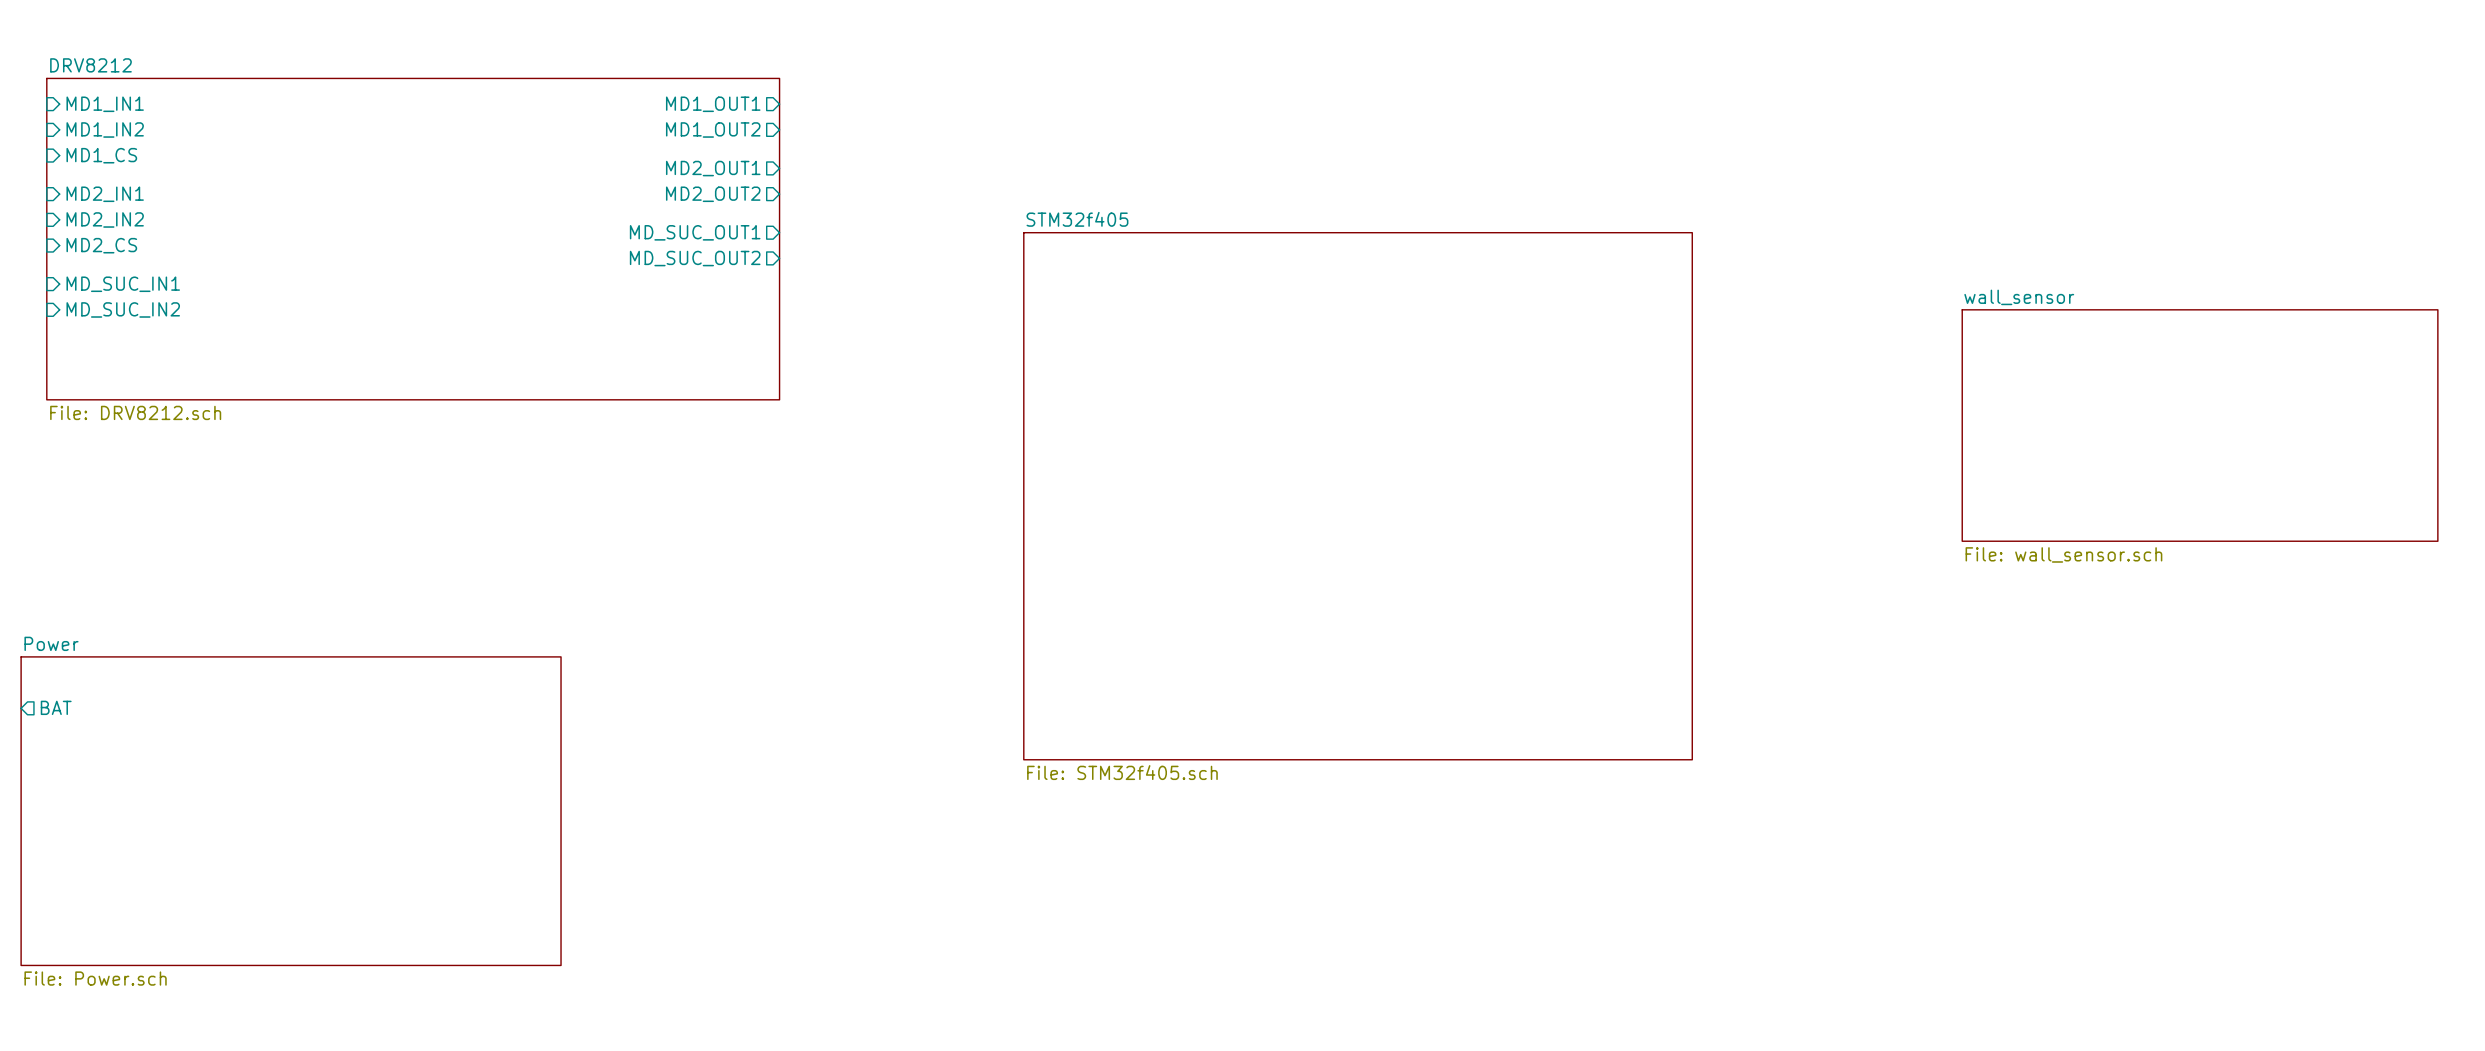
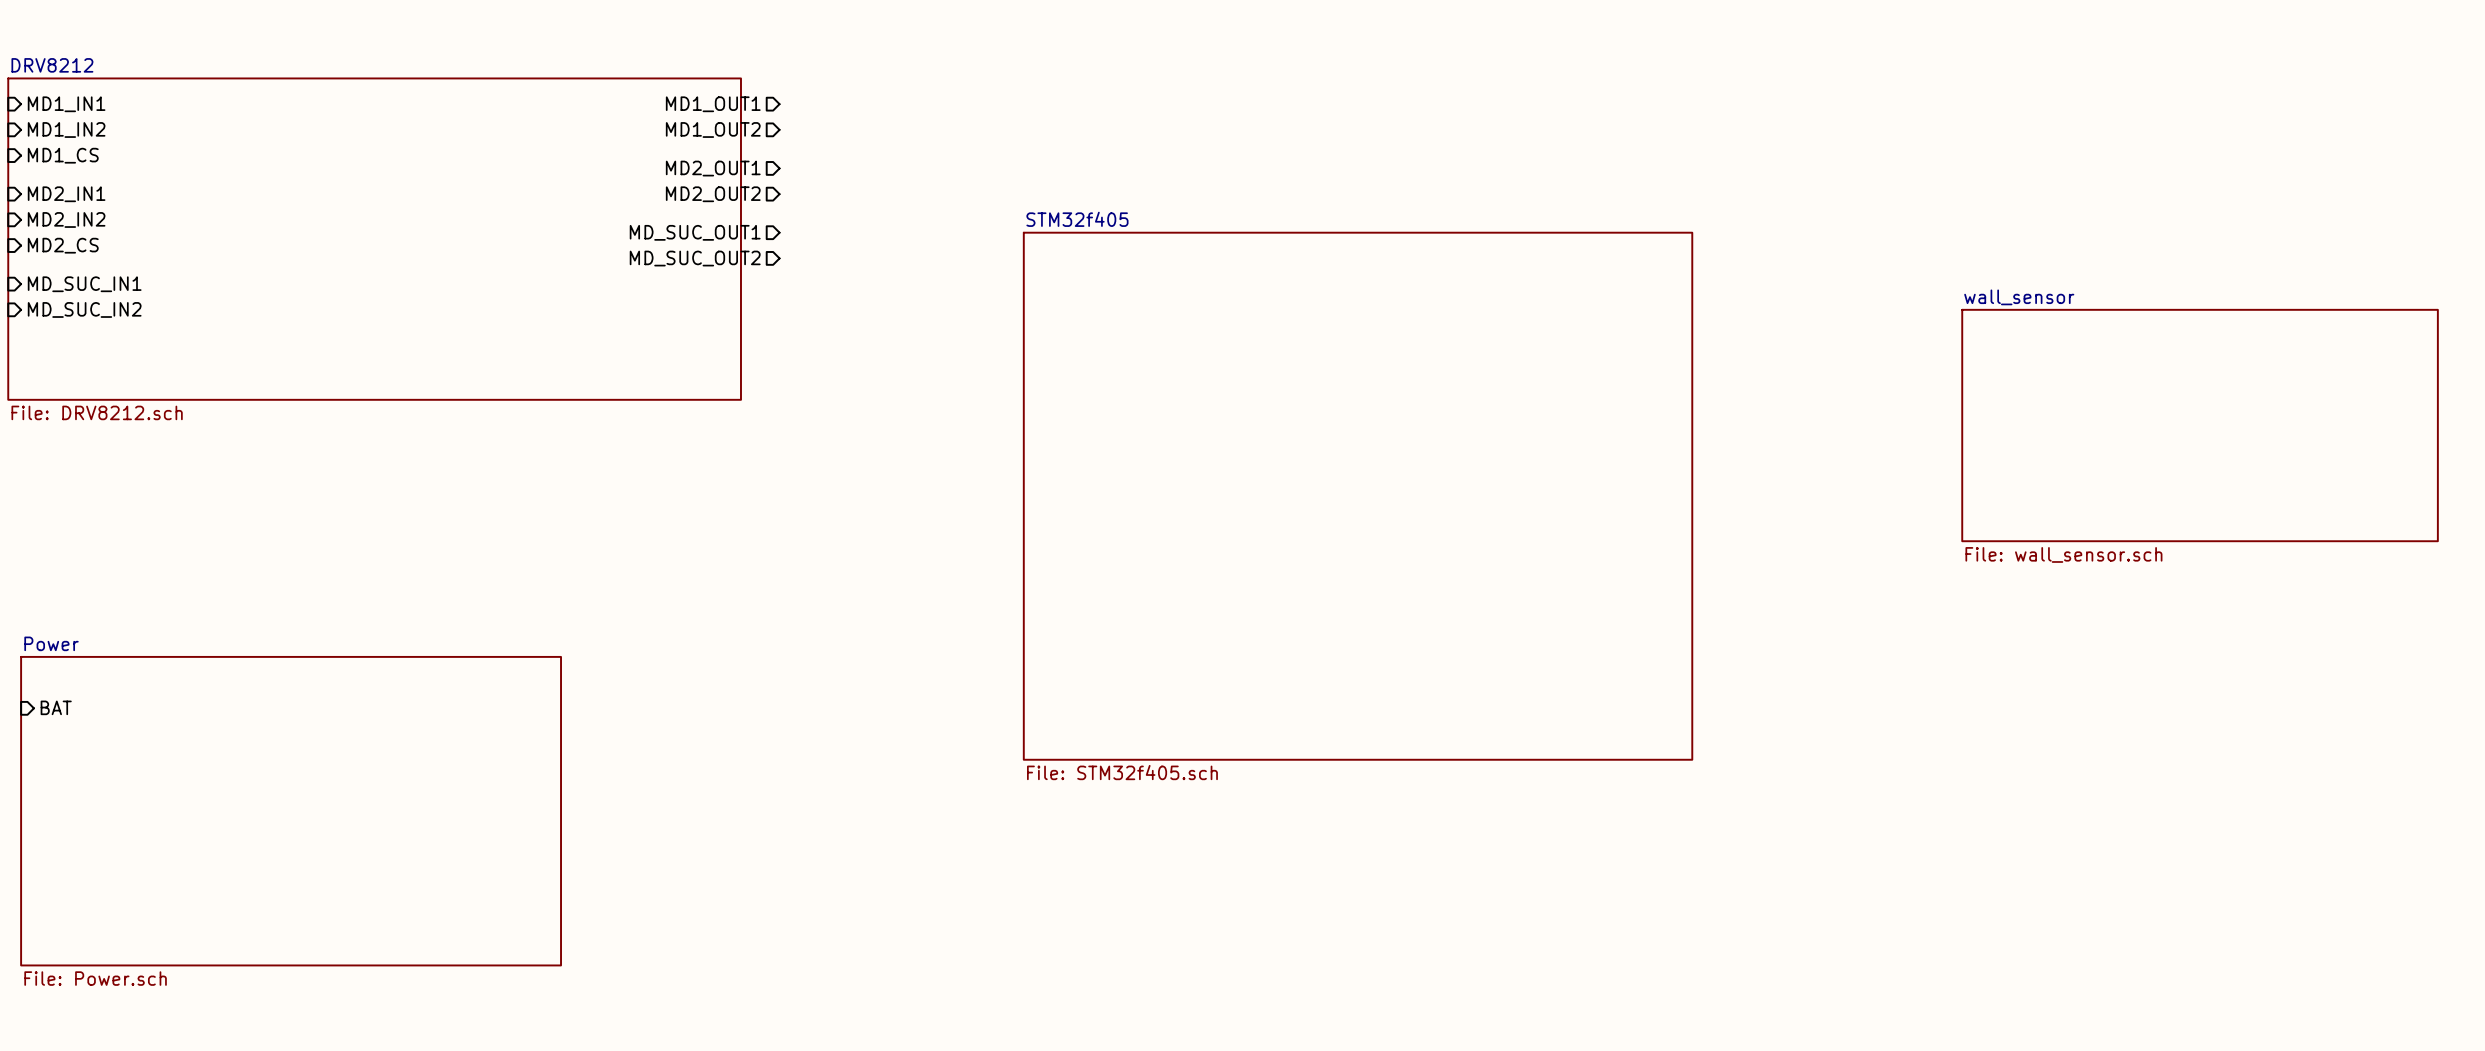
sheet pin position: MD1_IN1 (105, 104) -> MD1_IN1 (66, 104)
sheet pin position: MD1_IN2 (105, 129) -> MD1_IN2 (66, 129)
sheet pin position: MD1_CS (101, 155) -> MD1_CS (63, 155)
sheet pin position: MD2_IN1 (105, 194) -> MD2_IN1 (66, 194)
sheet pin position: MD2_IN2 (105, 219) -> MD2_IN2 (66, 219)
sheet DRV8212 position: (413, 239) -> (374, 239)
sheet pin position: MD2_CS (101, 245) -> MD2_CS (63, 245)
sheet pin position: MD_SUC_IN1 (123, 284) -> MD_SUC_IN1 (84, 284)
sheet pin position: MD_SUC_IN2 (123, 309) -> MD_SUC_IN2 (84, 309)
sheet pin shape: output (56, 707) -> input (56, 707)

